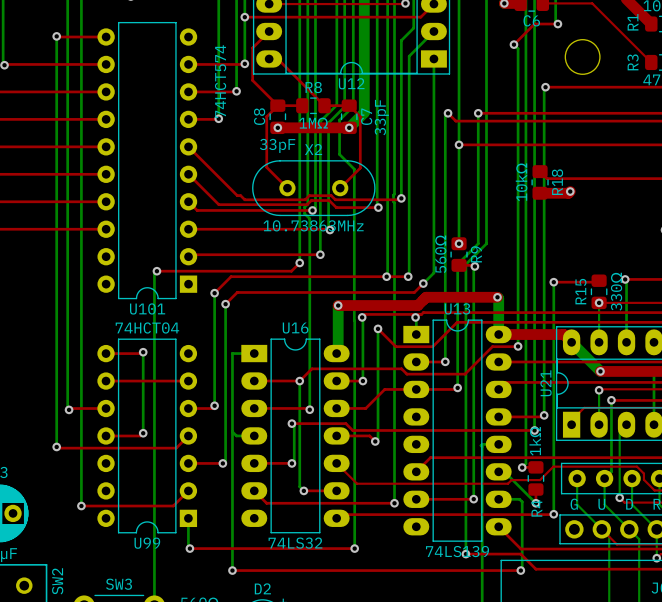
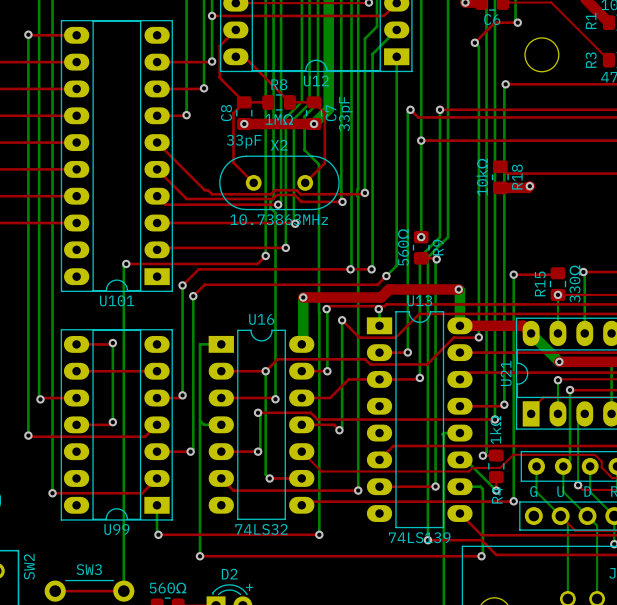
U101 footprint: [97, 21, 198, 300] -> [60, 20, 173, 292]
U101 value: 74HCT574 (220, 81) -> none
U99 value: 74HCT04 (147, 327) -> none
U99 footprint: [97, 338, 198, 534] -> [60, 329, 173, 521]

